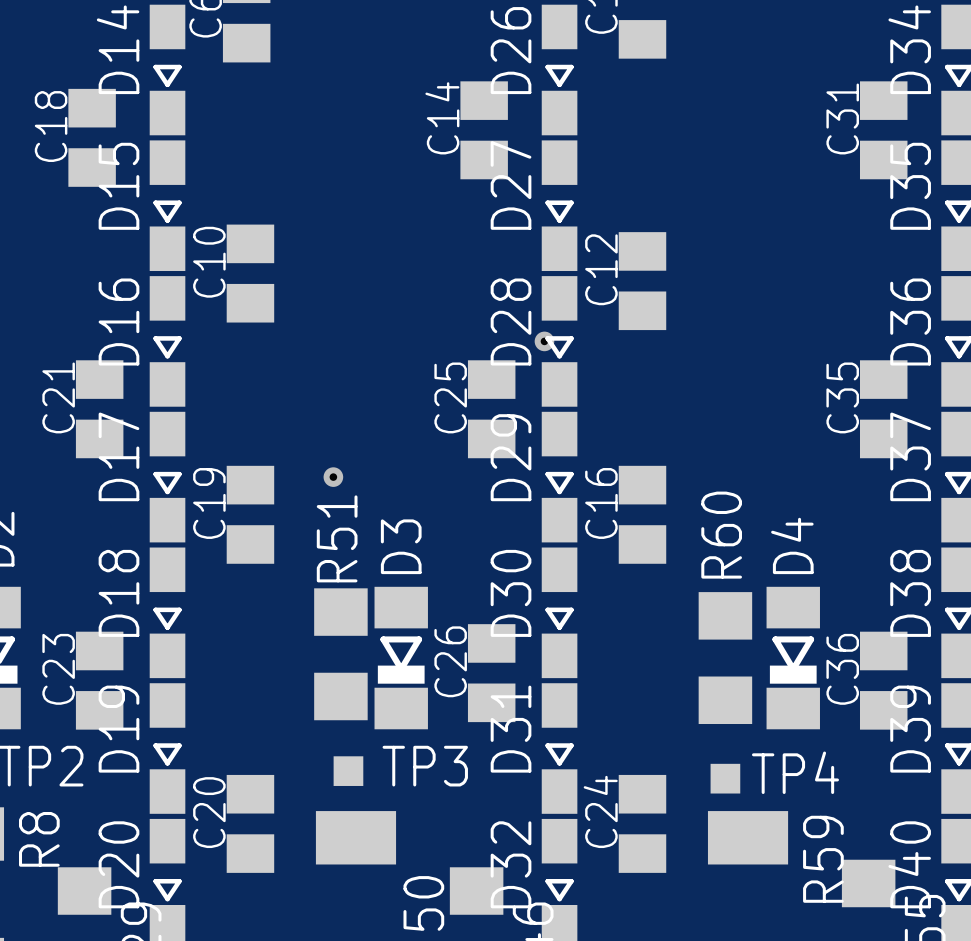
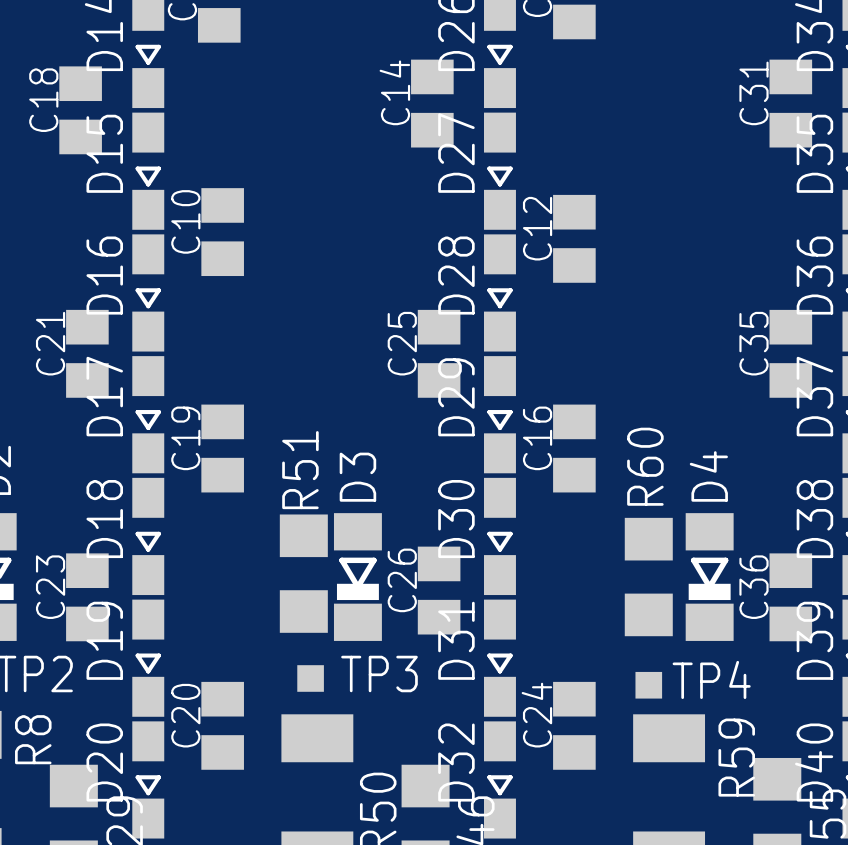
via: (544, 341) -> none
via: (333, 477) -> none

